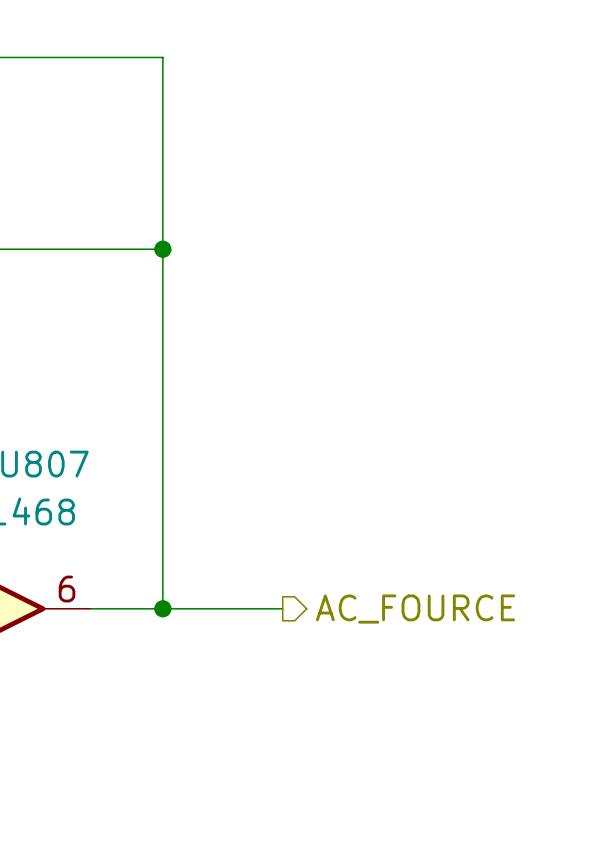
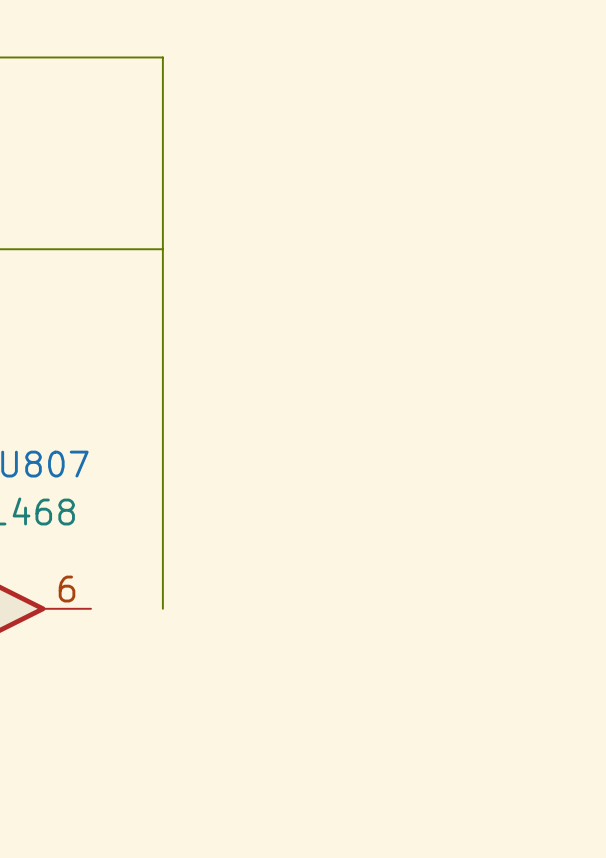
junction: (162, 249) -> none
wire: (90, 608) (282, 608) -> none
junction: (162, 608) -> none
hierarchical label: AC_FOURCE (415, 609) -> none

